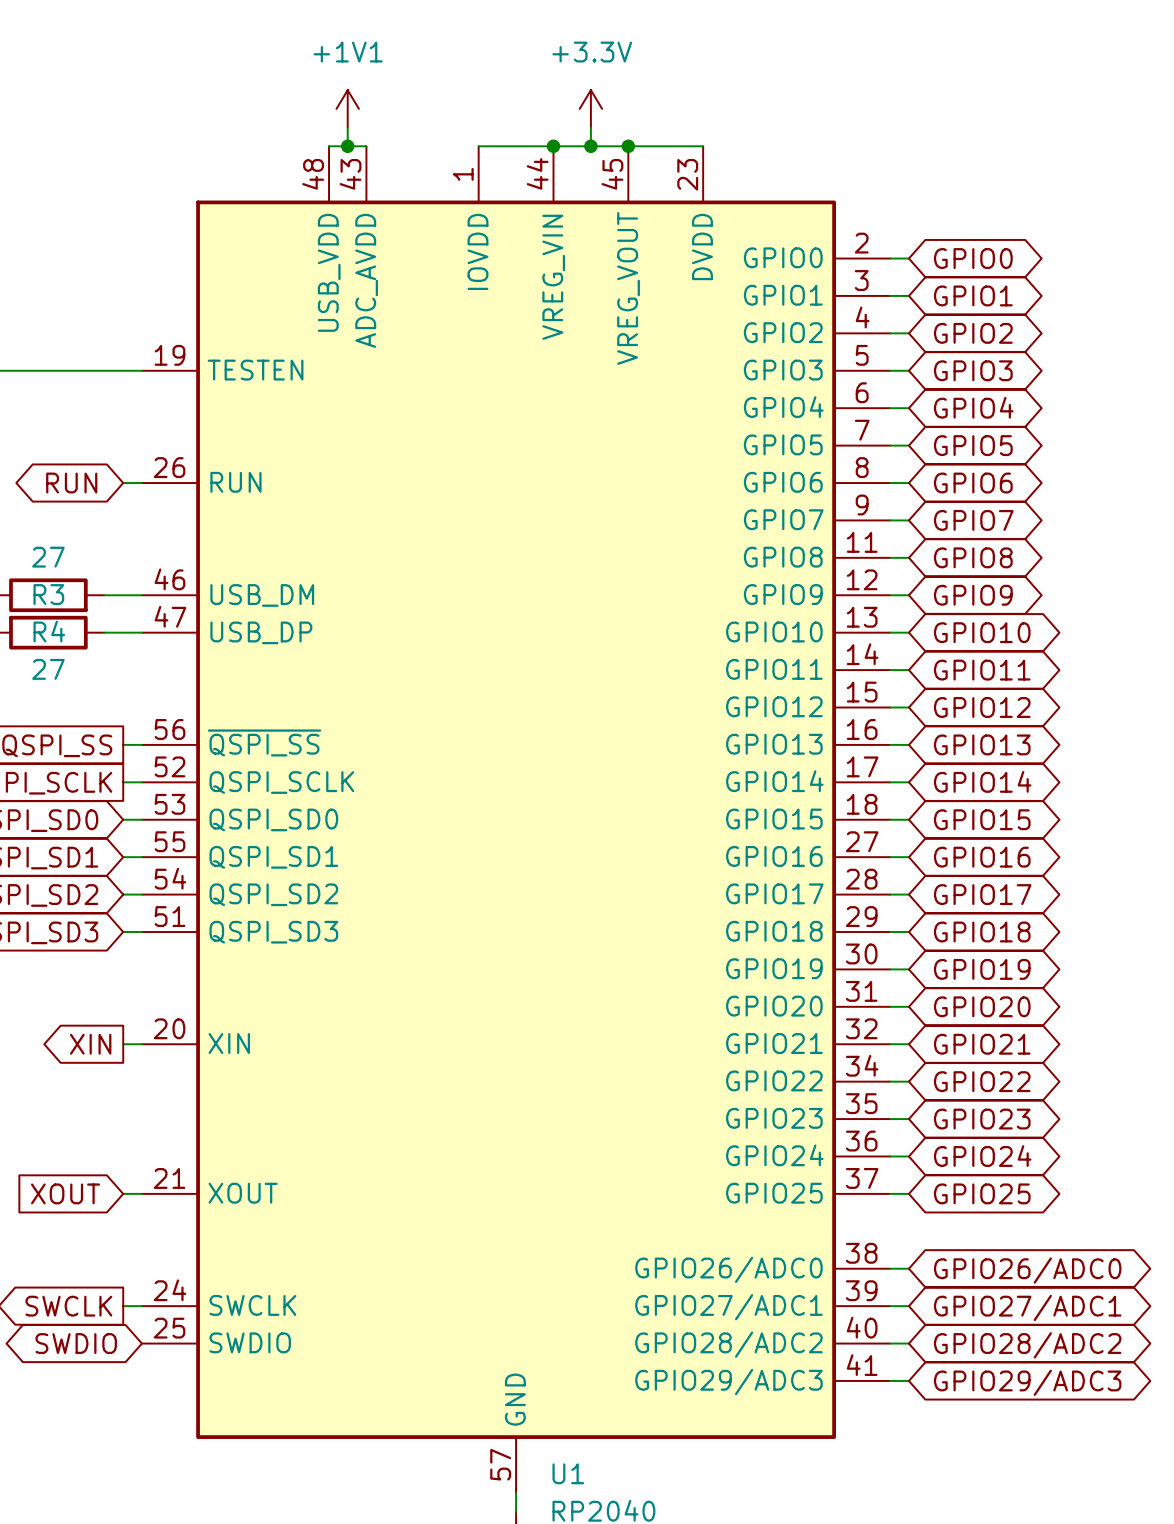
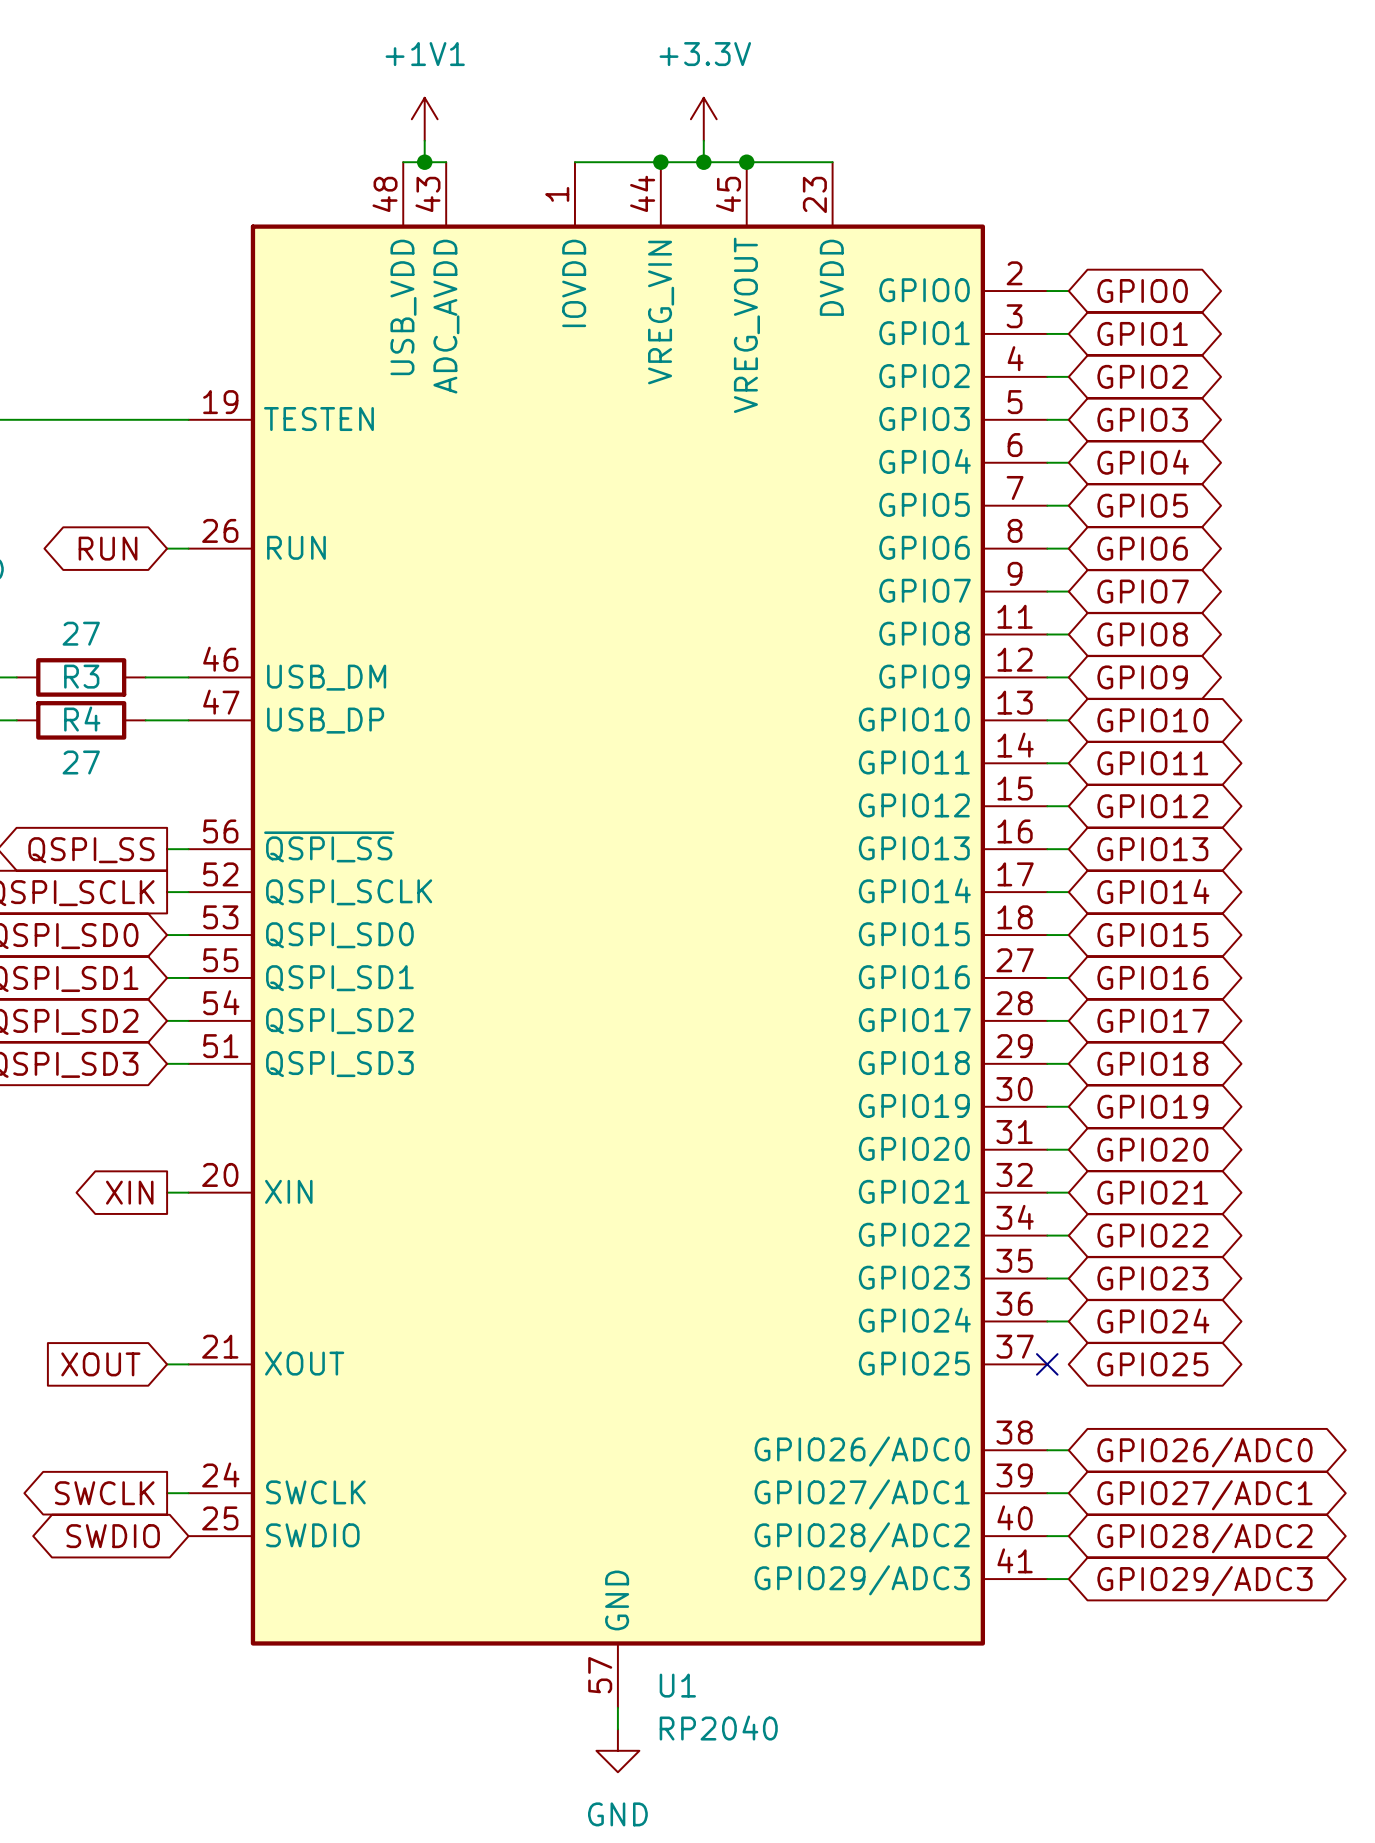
wire: (890, 1193) (908, 1193) -> none
no-connect mark: none -> (1047, 1364)

